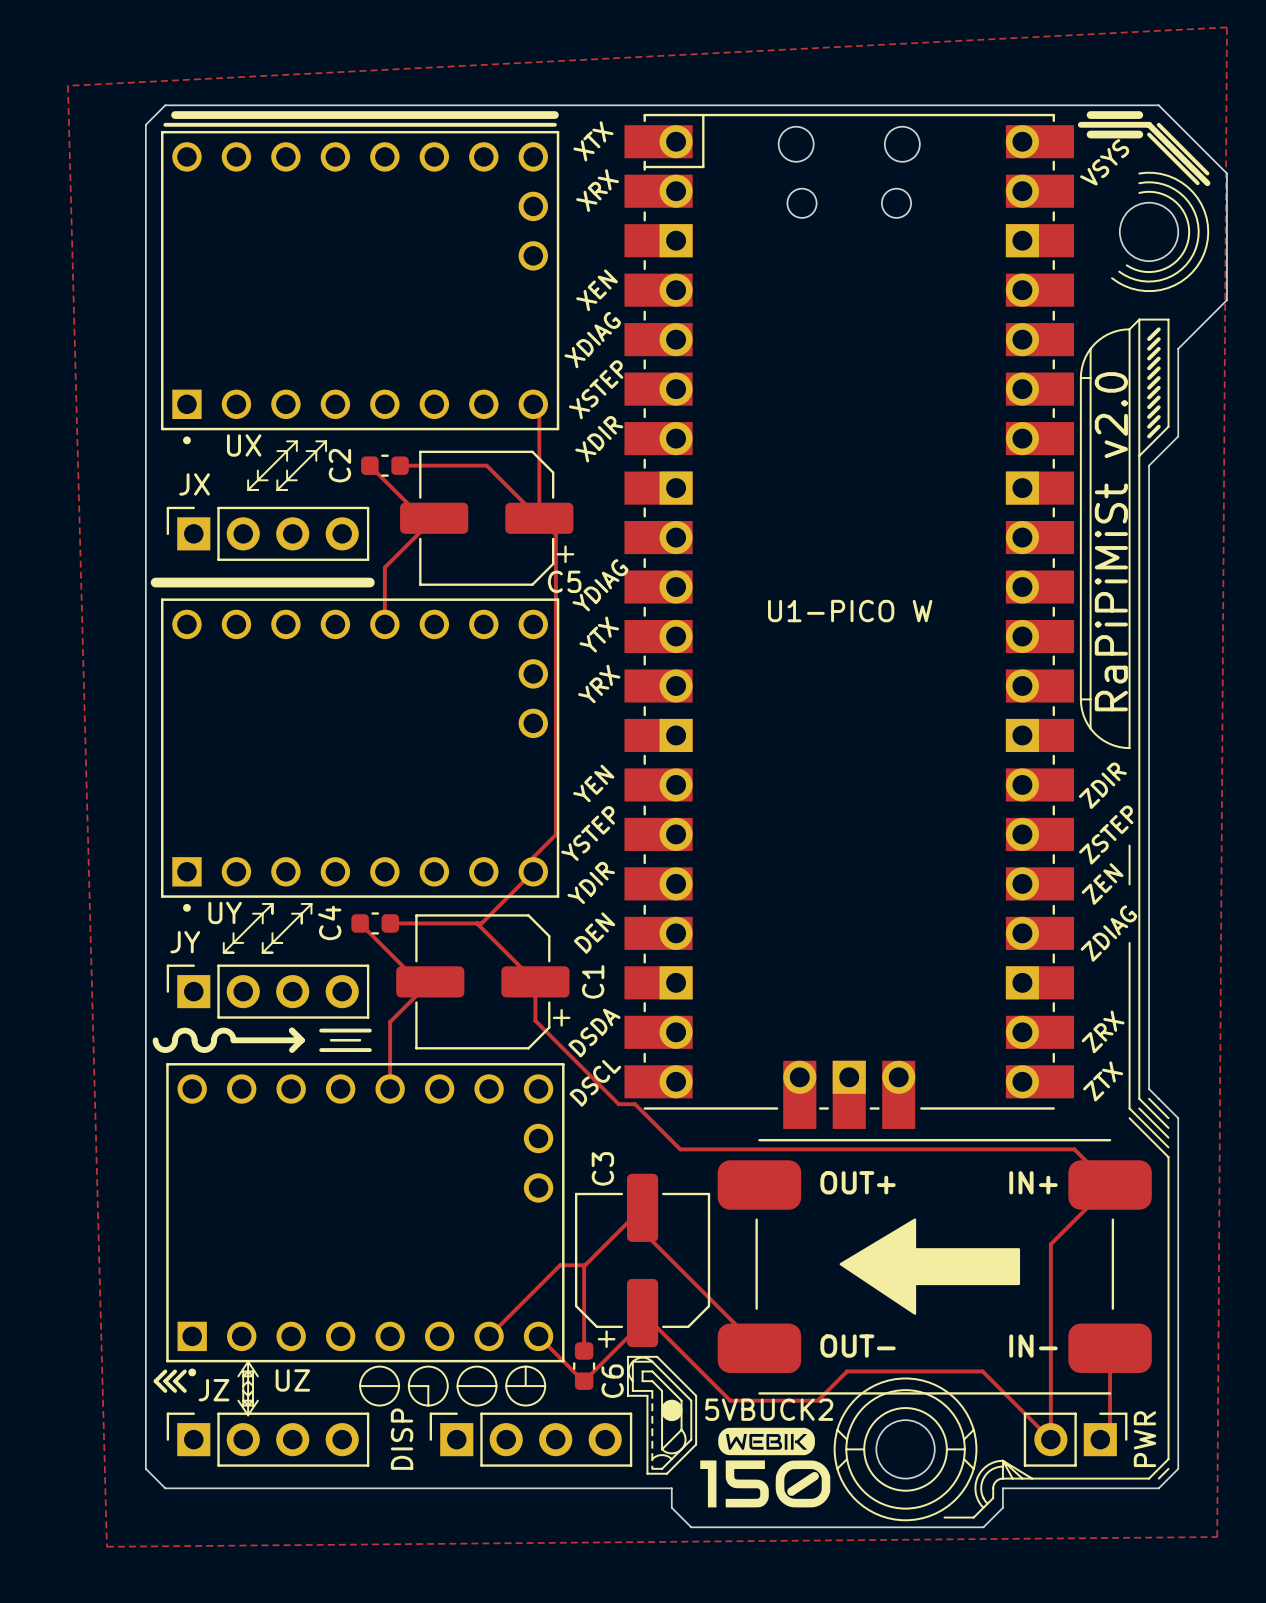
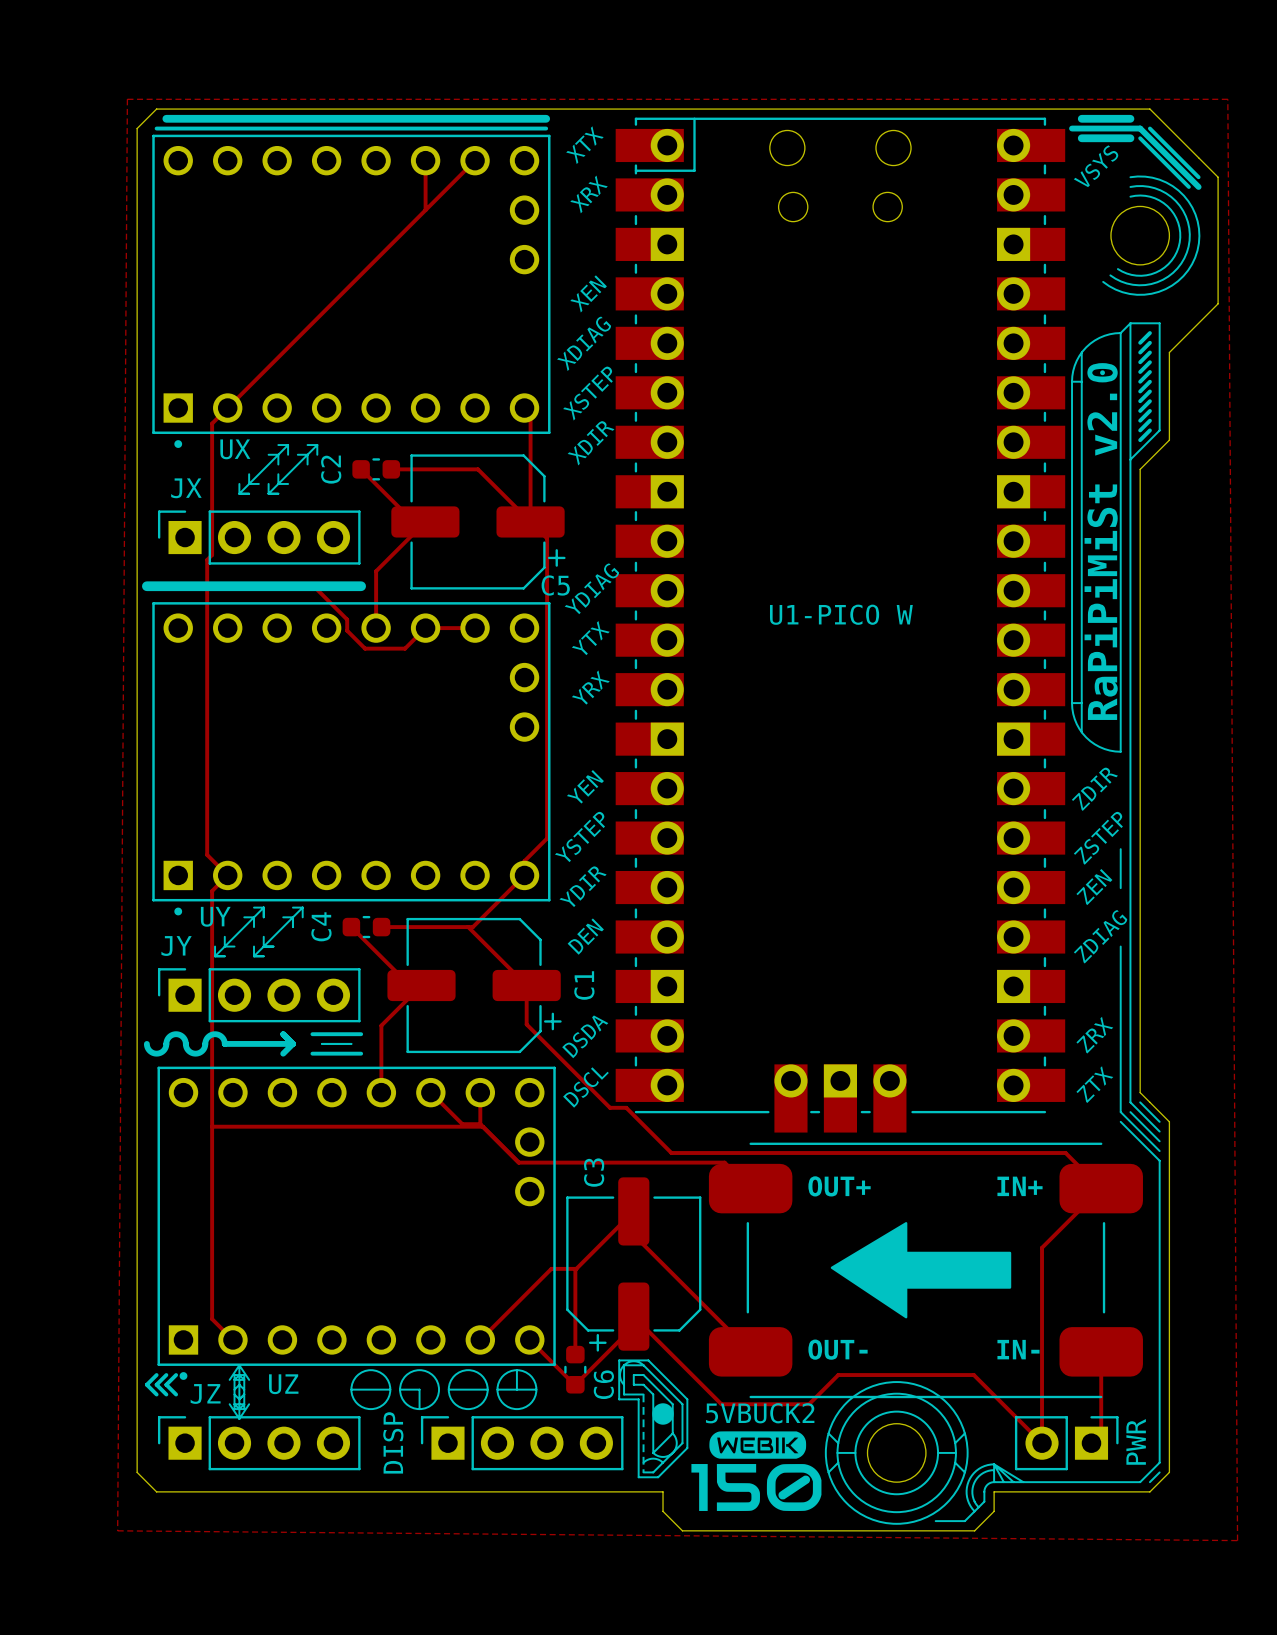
zone outline: (1226, 27) (1217, 1537) (106, 1546) (67, 85) (1226, 27) -> (127, 99) (117, 1530) (1237, 1540) (1227, 99) (127, 99)
track: none -> (425, 160) (425, 210)
track: none -> (475, 160) (212, 423) (212, 554) (207, 559) (207, 854) (227, 875) (212, 891) (212, 1319) (232, 1339)
track: none -> (207, 586) (313, 586) (347, 619) (347, 630) (365, 648) (405, 648) (425, 628) (475, 628)
track: none -> (430, 1092) (462, 1124) (480, 1124)
track: none -> (480, 1092) (480, 1124)
track: none -> (480, 1124) (518, 1162) (724, 1162) (750, 1188)
track: none -> (212, 1126) (482, 1126)

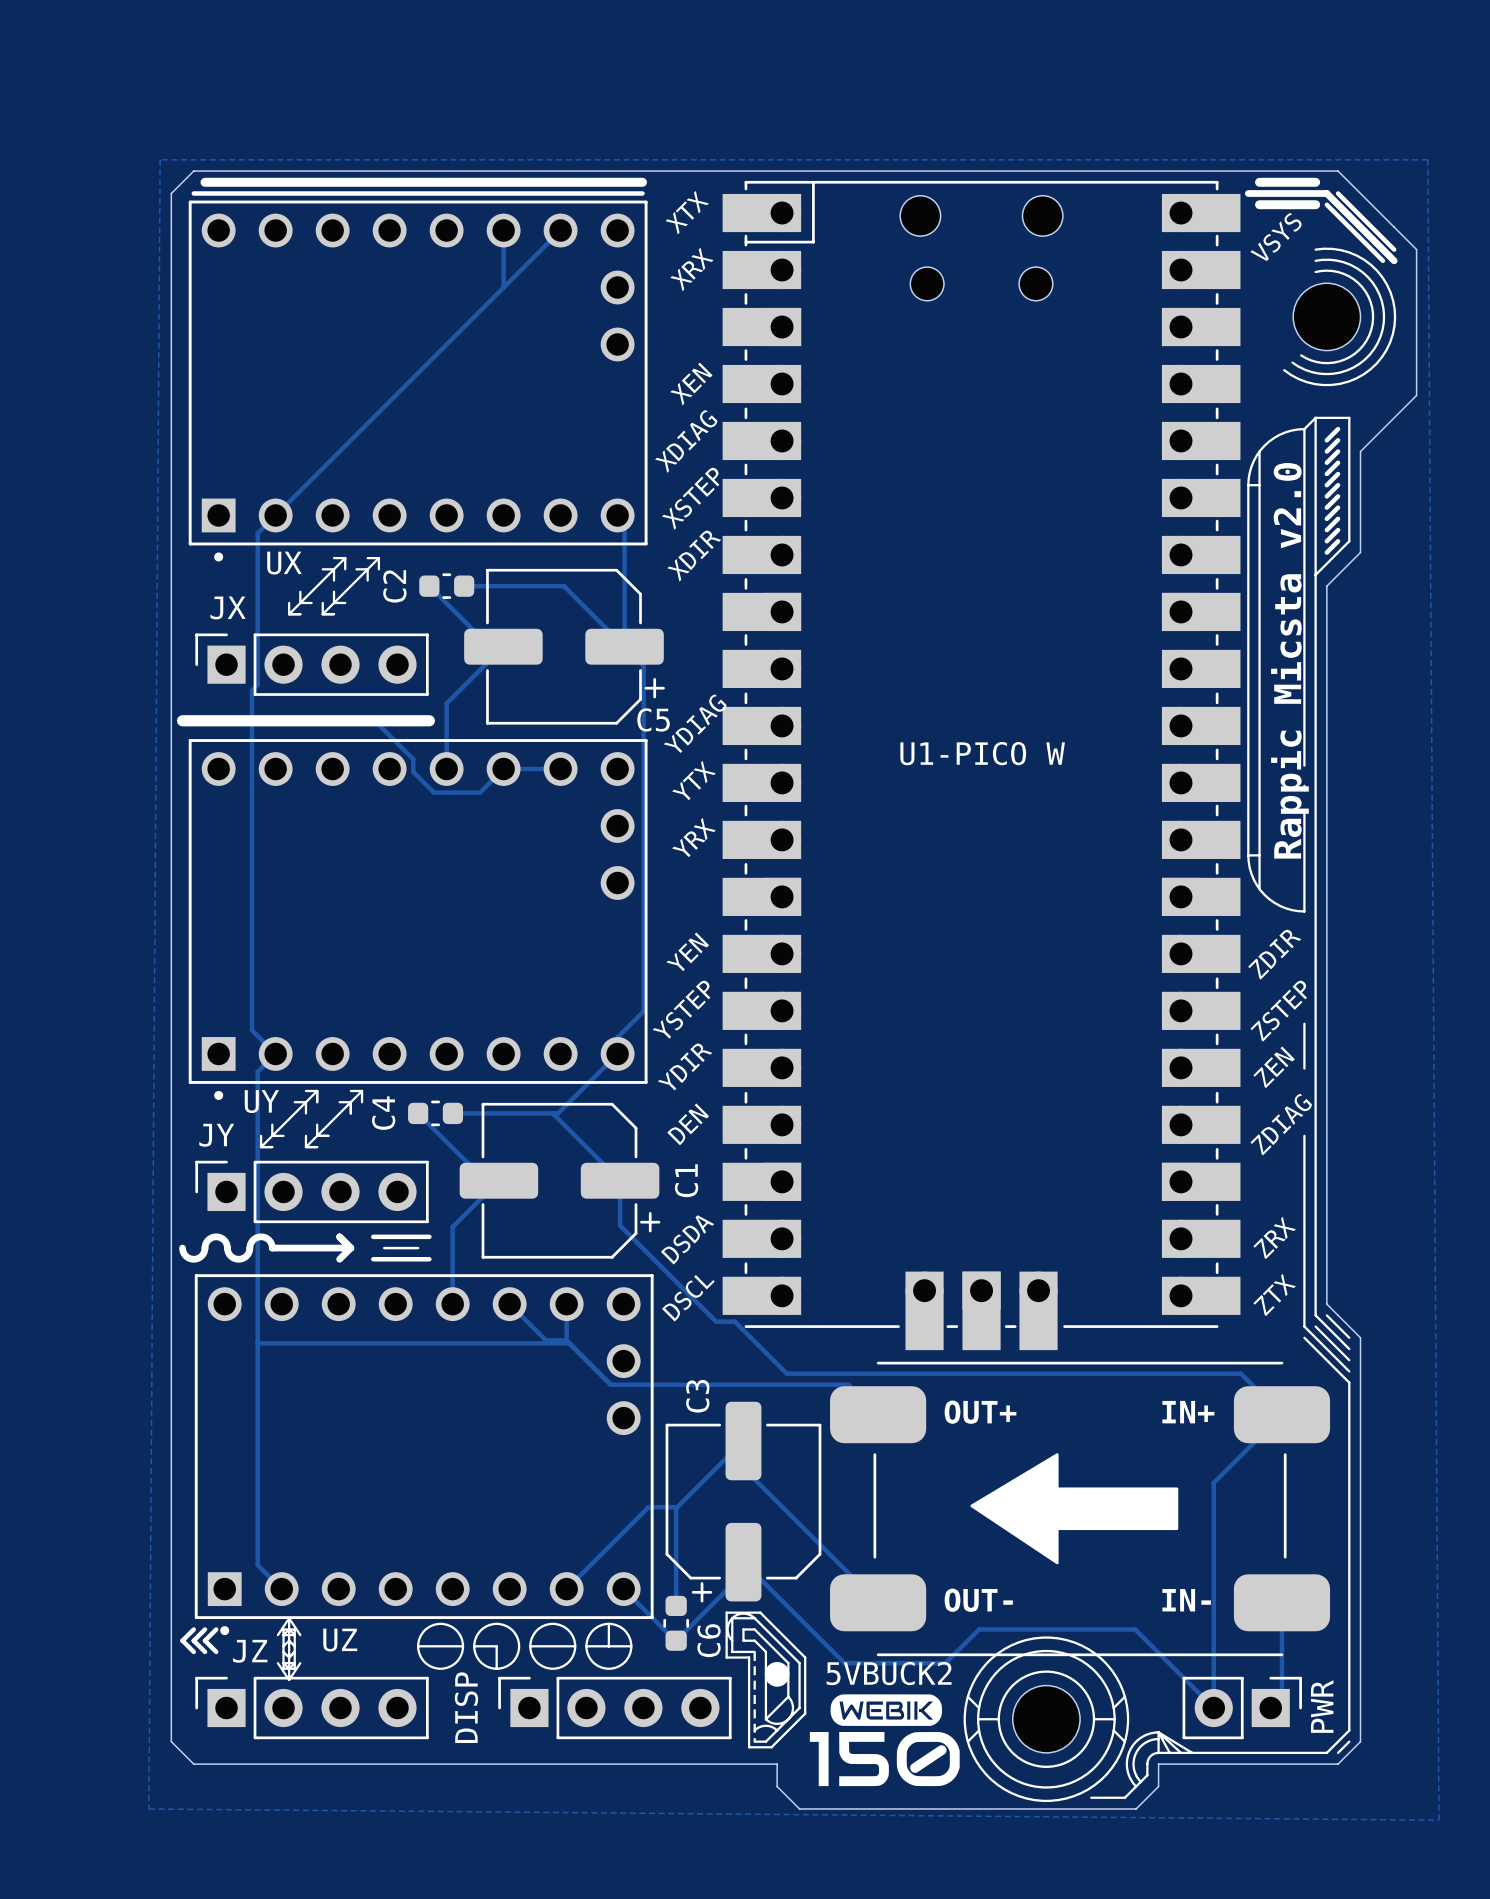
text: RaPiPiMiSt v2.0 (1101, 541) -> Rappic Micsta v2.0 (1289, 660)
line: (1120, 625) (1120, 642) -> none
line: (1120, 646) (1120, 664) -> none

